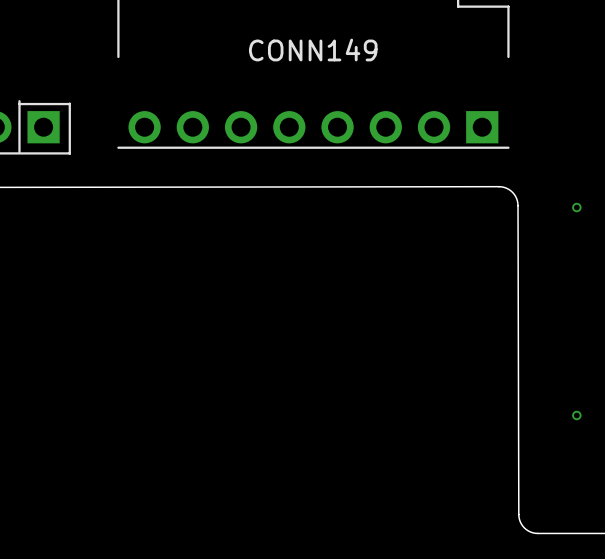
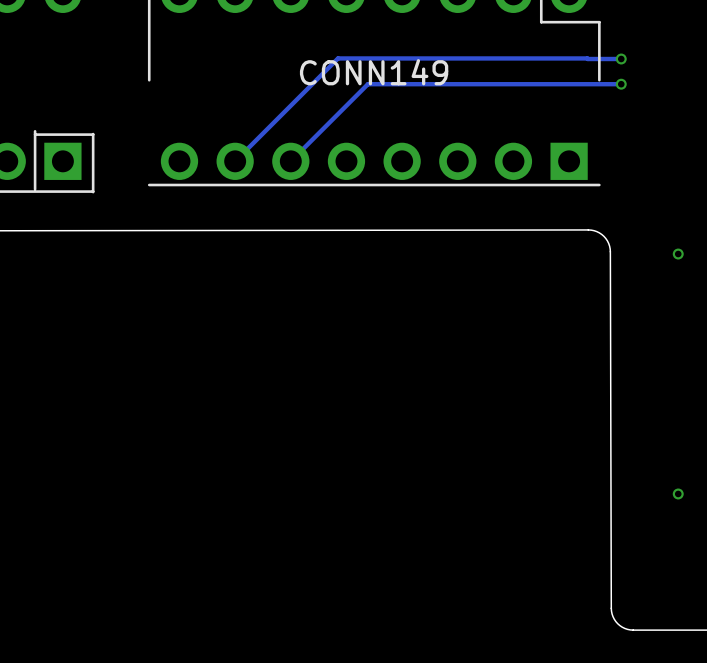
track: none -> (621, 59) (338, 58) (235, 161)
via: none -> (621, 59)
track: none -> (621, 84) (367, 84) (290, 161)
via: none -> (621, 84)

